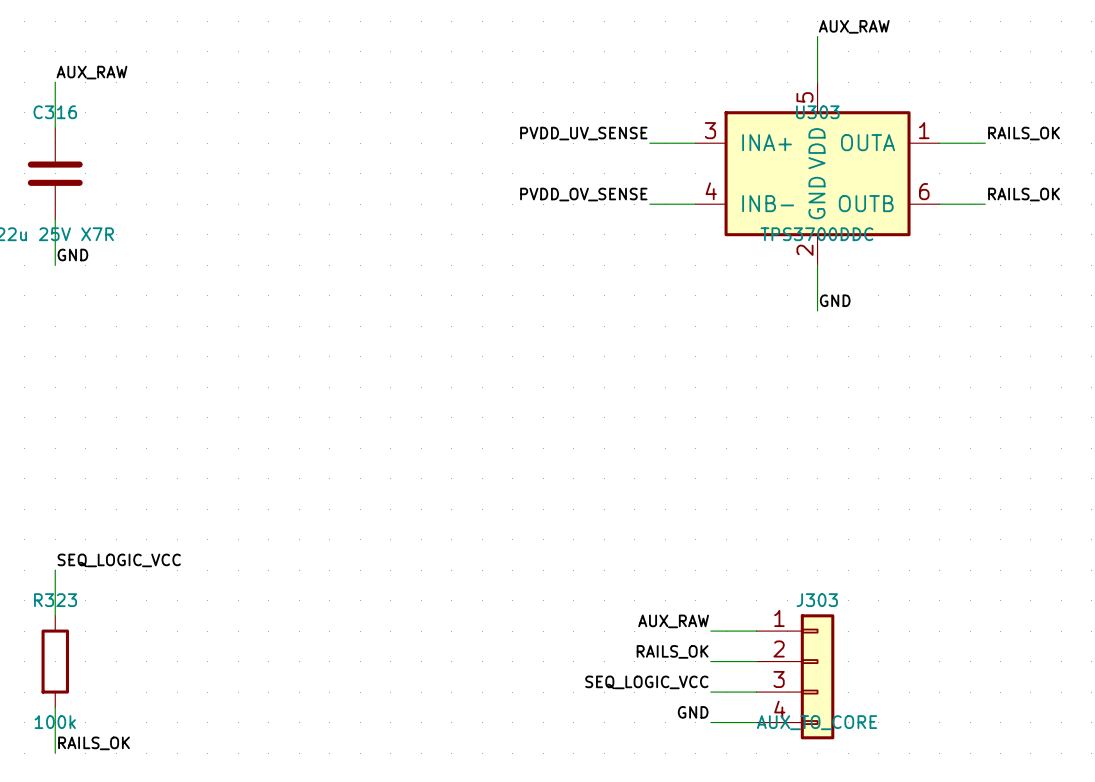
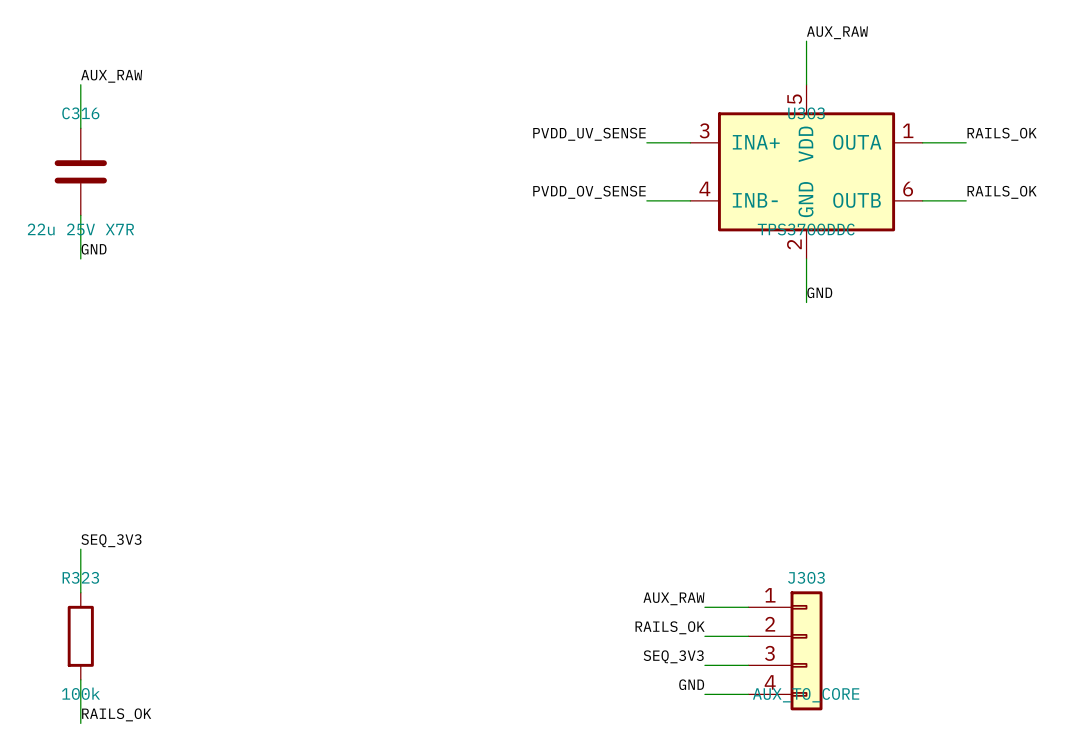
label: SEQ_LOGIC_VCC (119, 560) -> SEQ_3V3 (111, 540)
label: SEQ_LOGIC_VCC (646, 682) -> SEQ_3V3 (673, 656)

